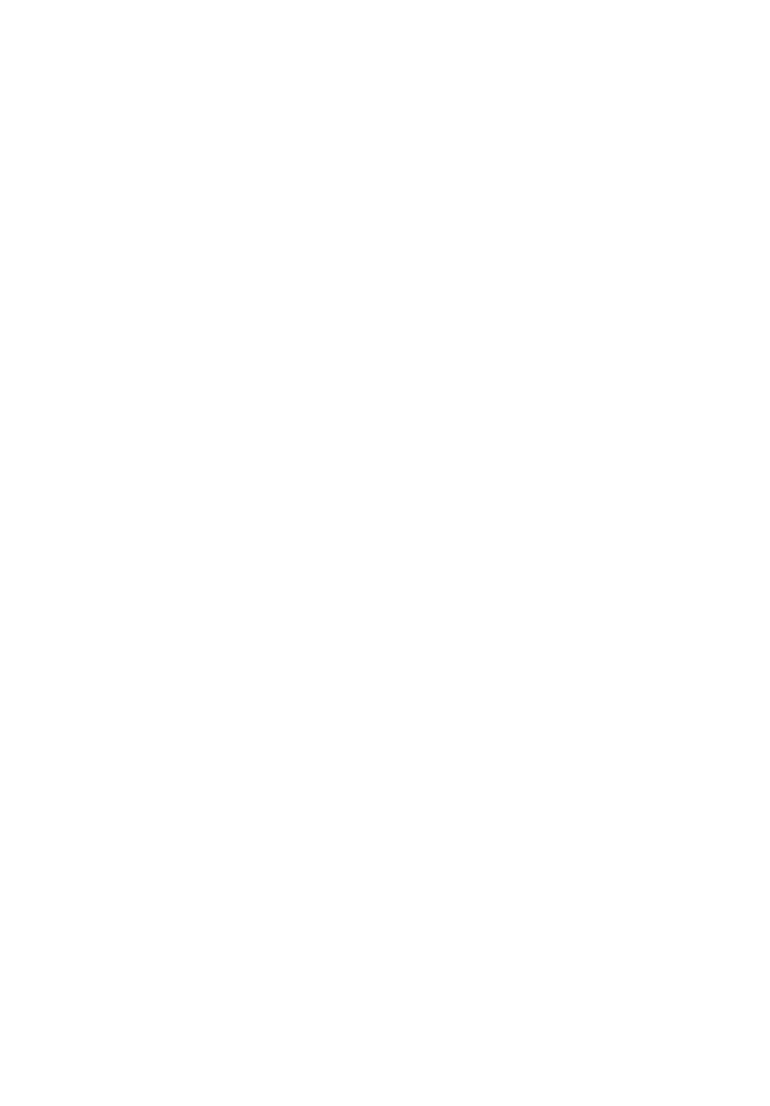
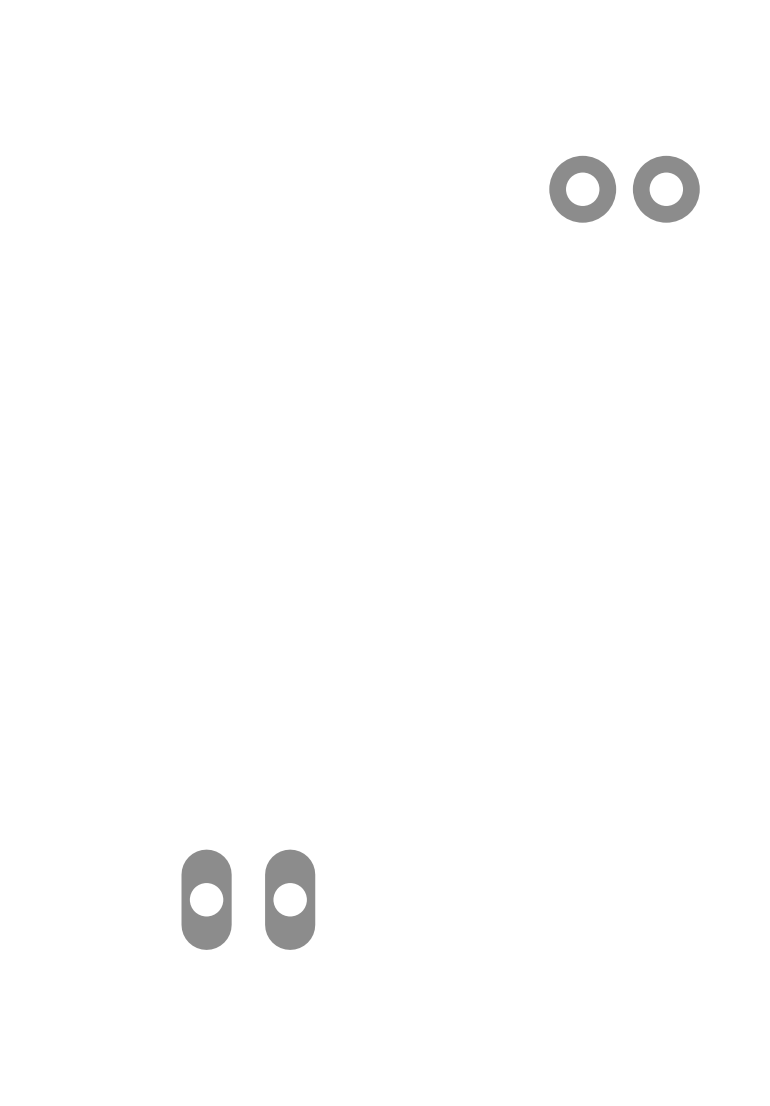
part: none -> (624, 189)
part: none -> (248, 899)

